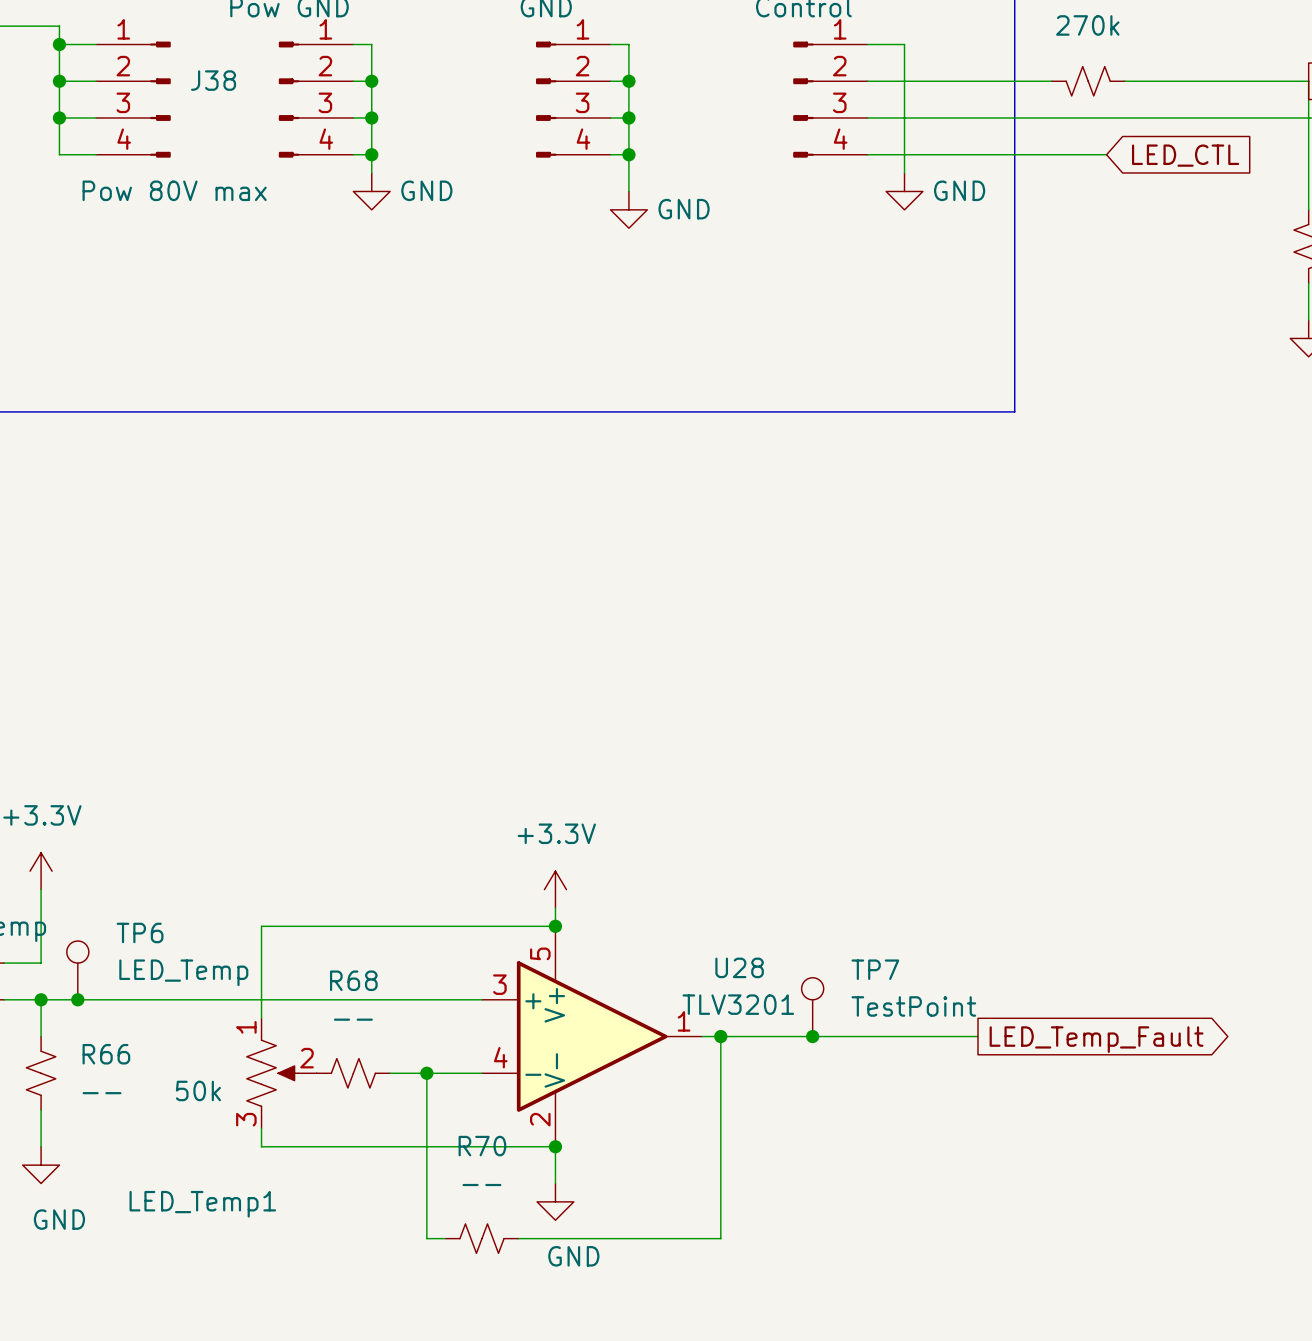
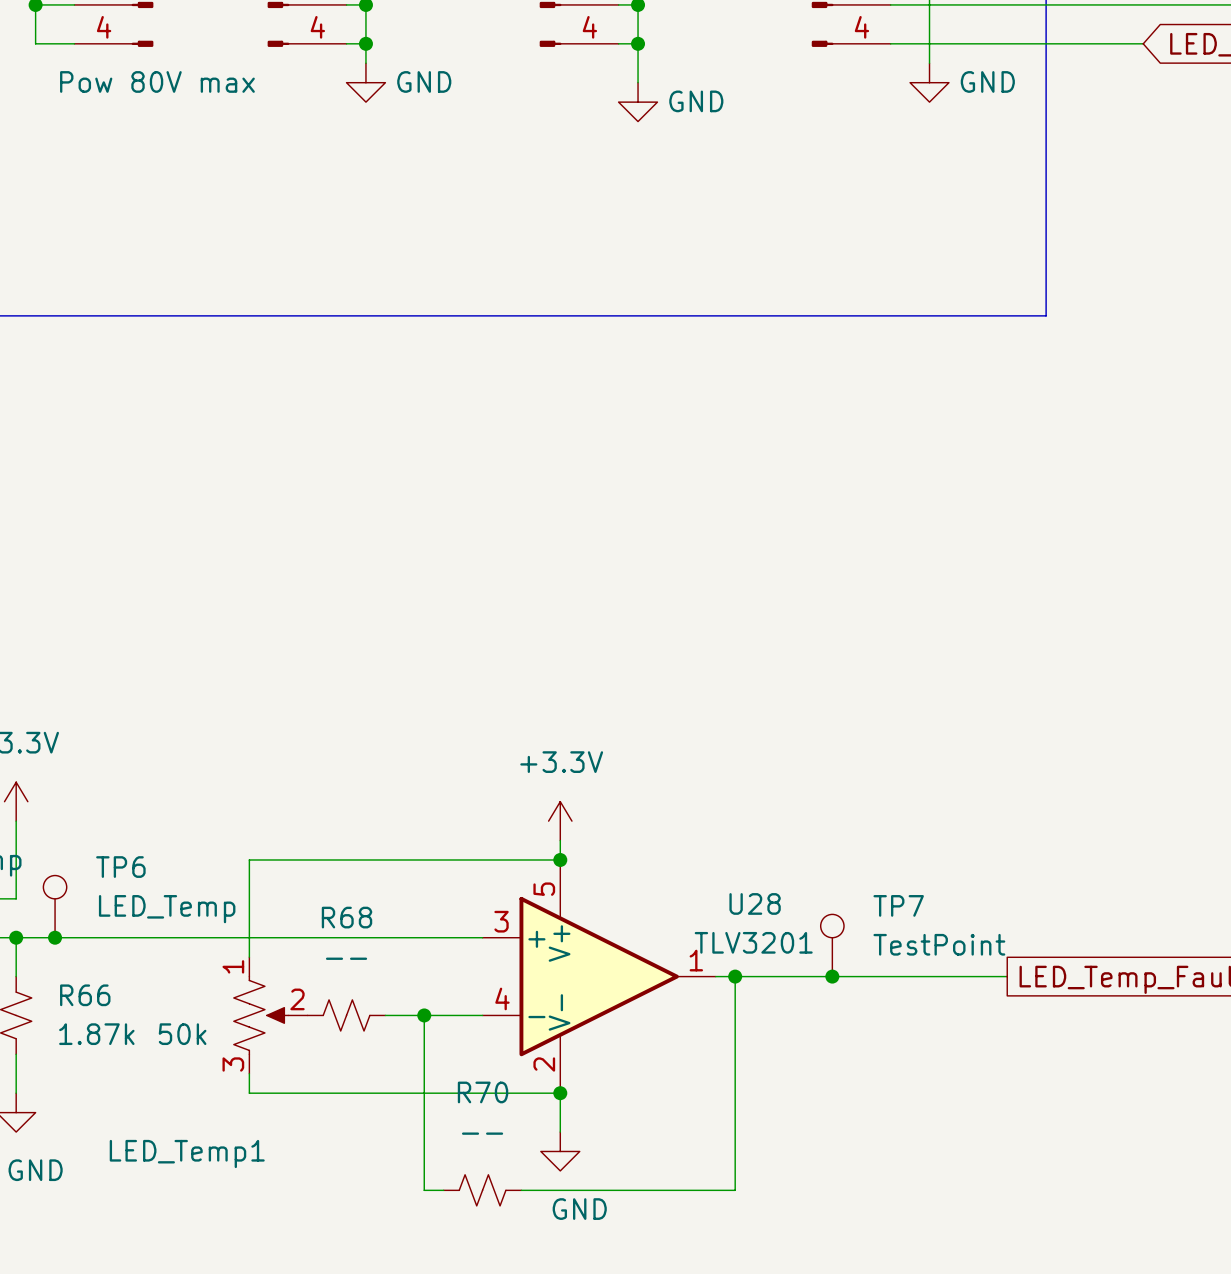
R66 value: -- (102, 1093) -> 1.87k (96, 1034)

